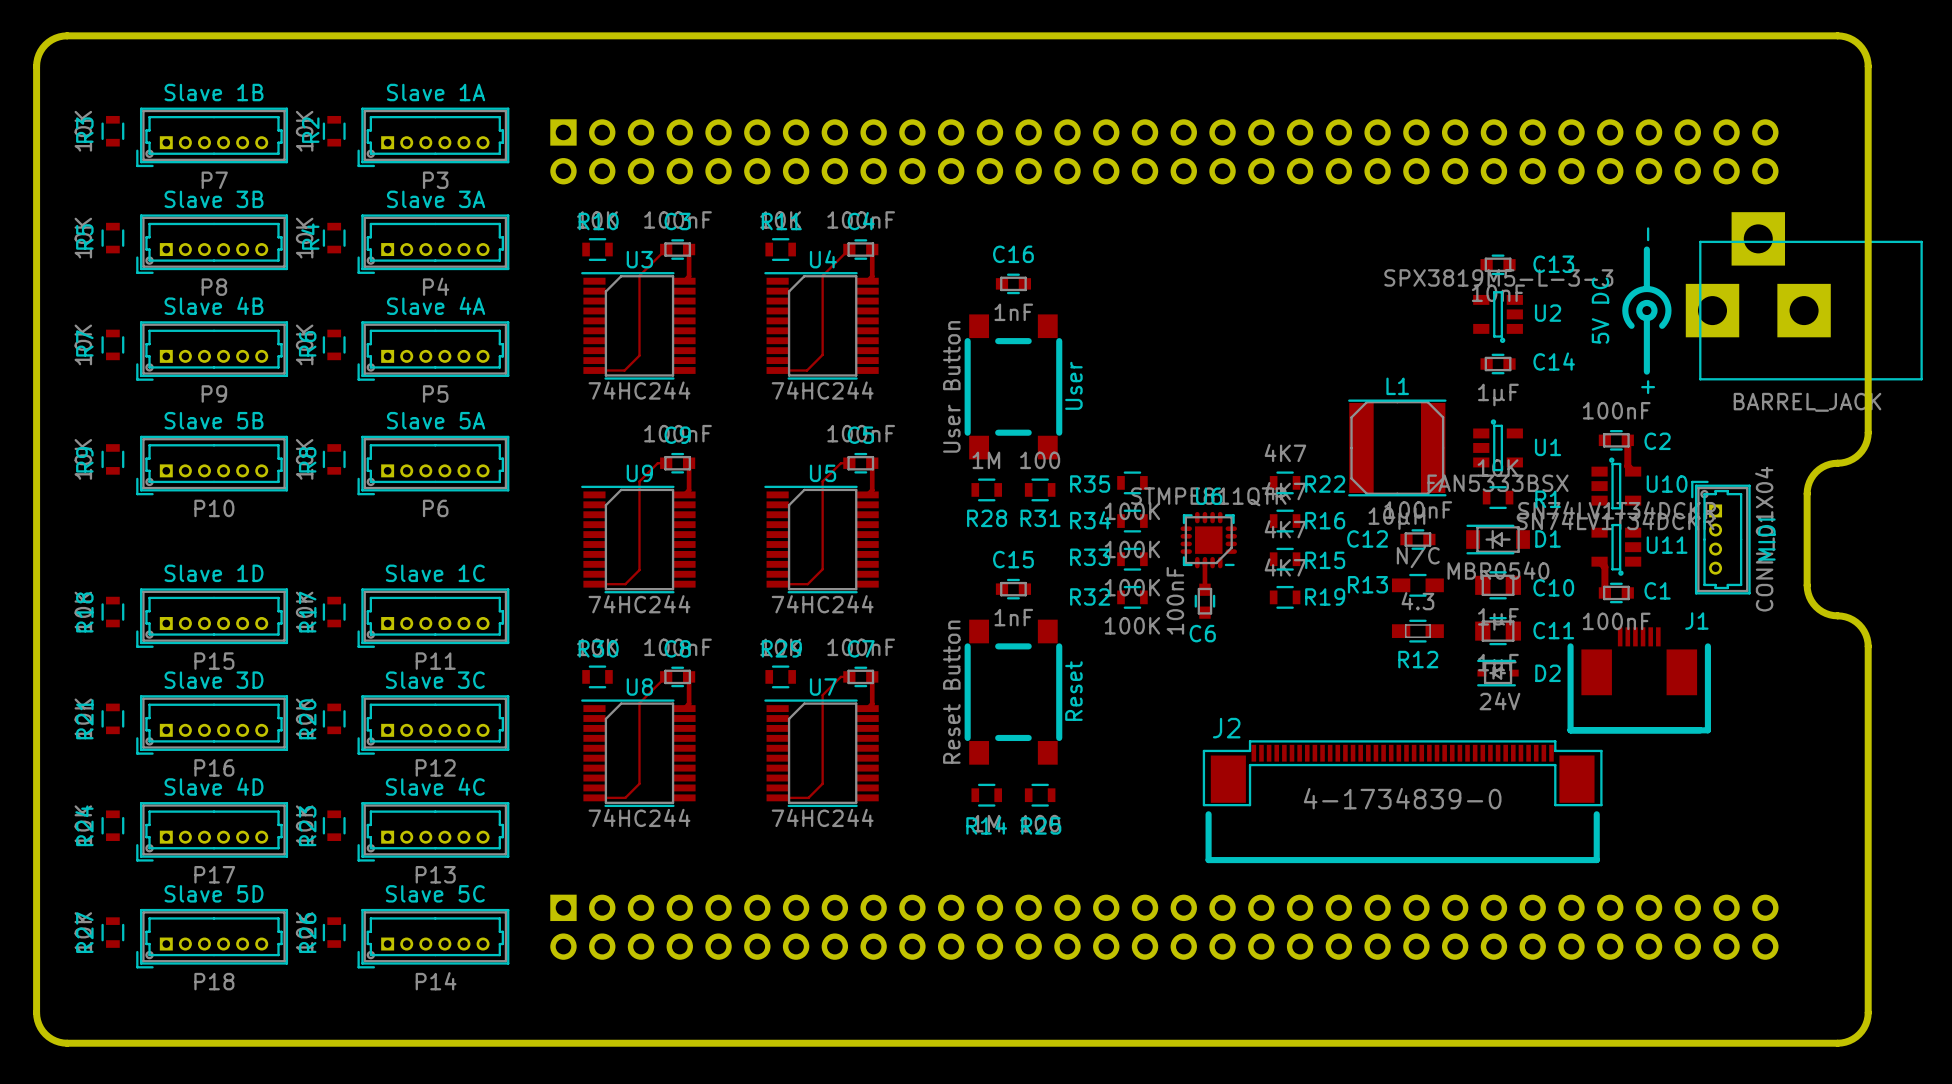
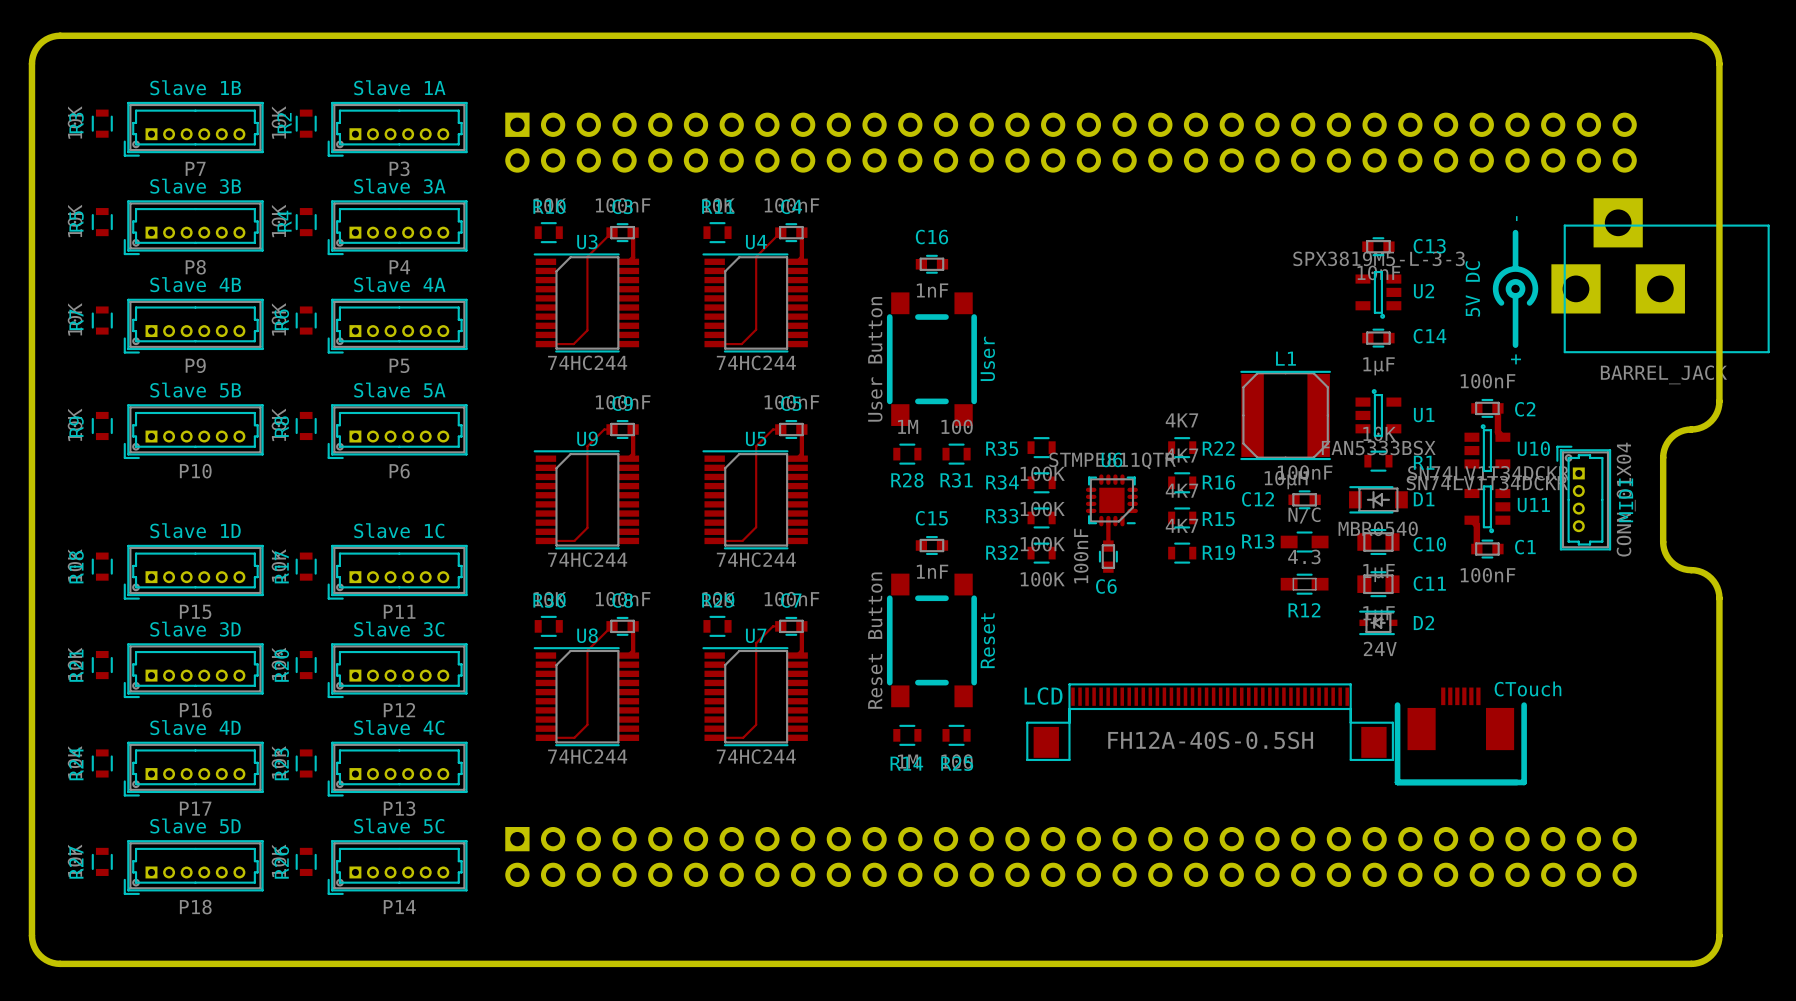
J1: (1639, 680) -> none
LCD: none -> FH12A-40S-0.5SH (1210, 722)
CTouch: none -> (1460, 736)
J2: 4-1734839-0 (1402, 801) -> none

